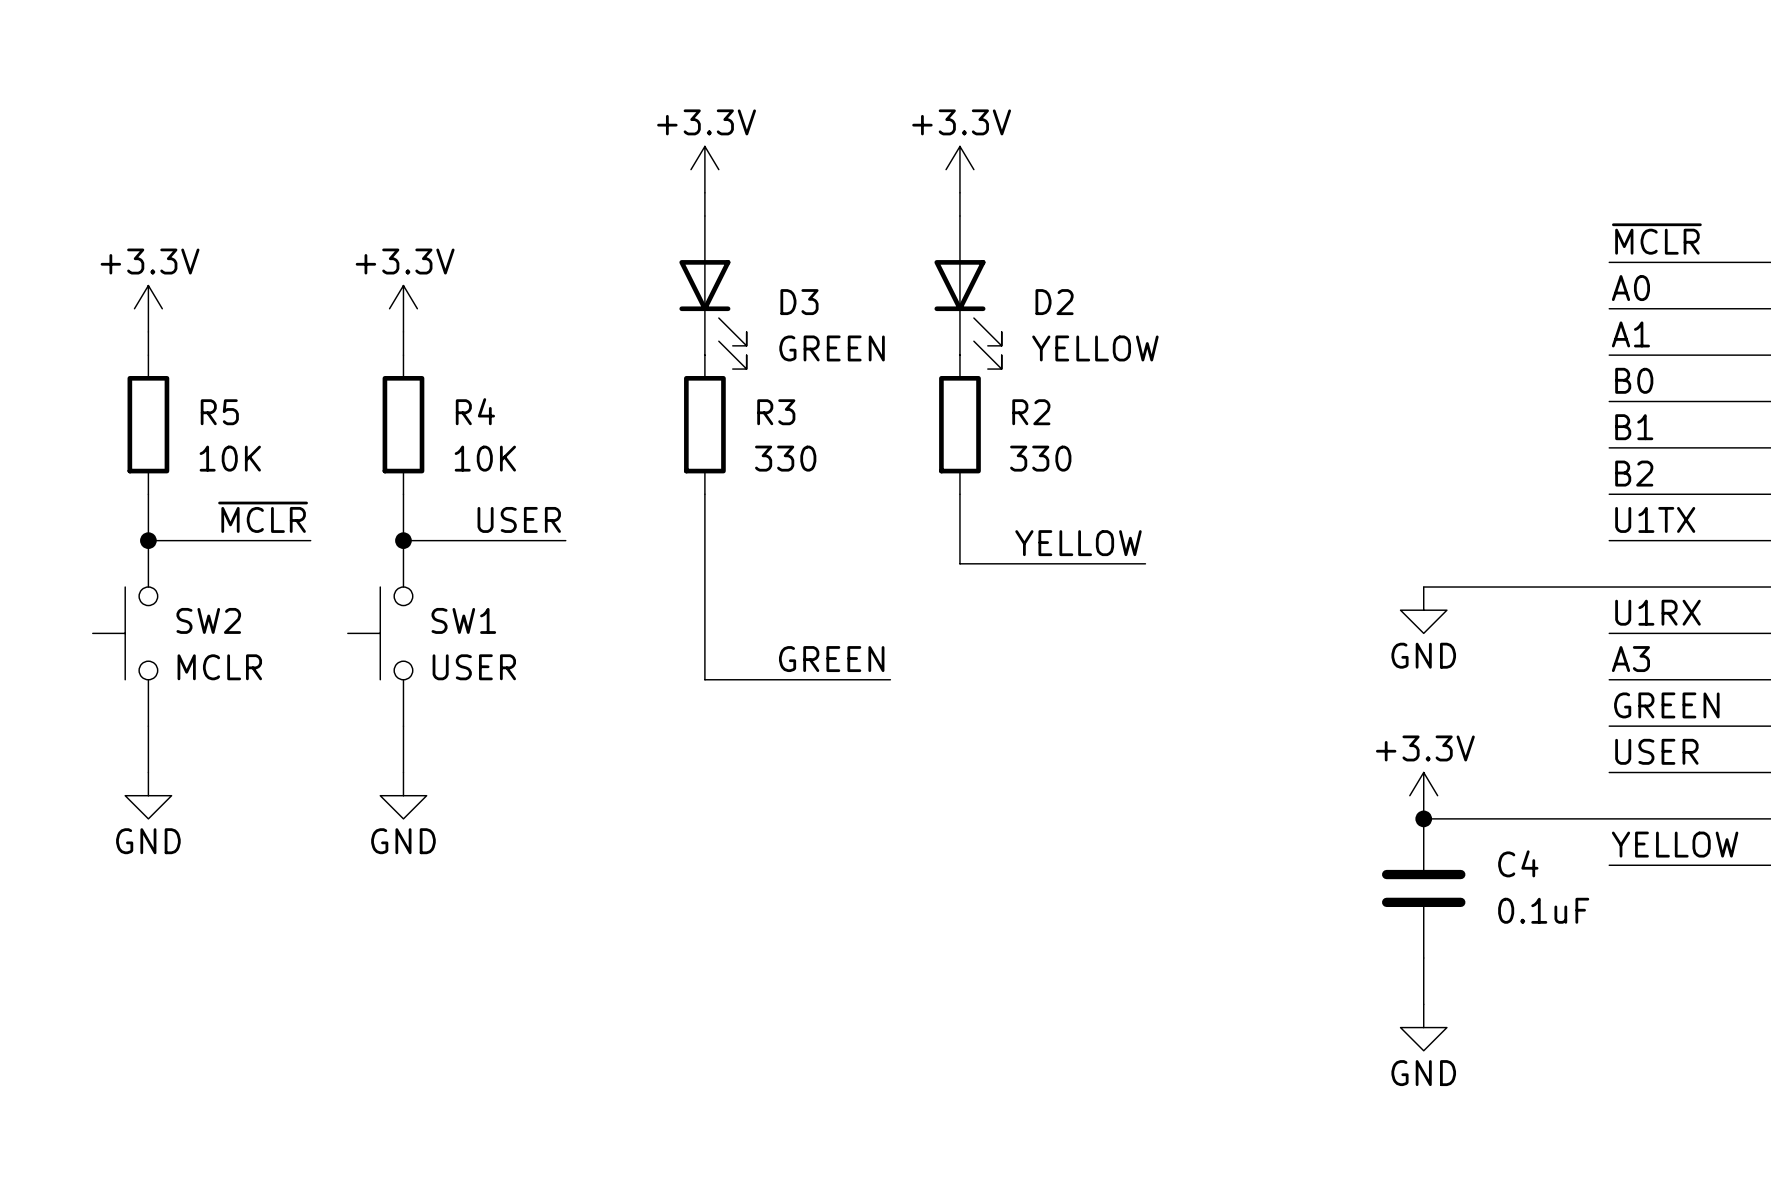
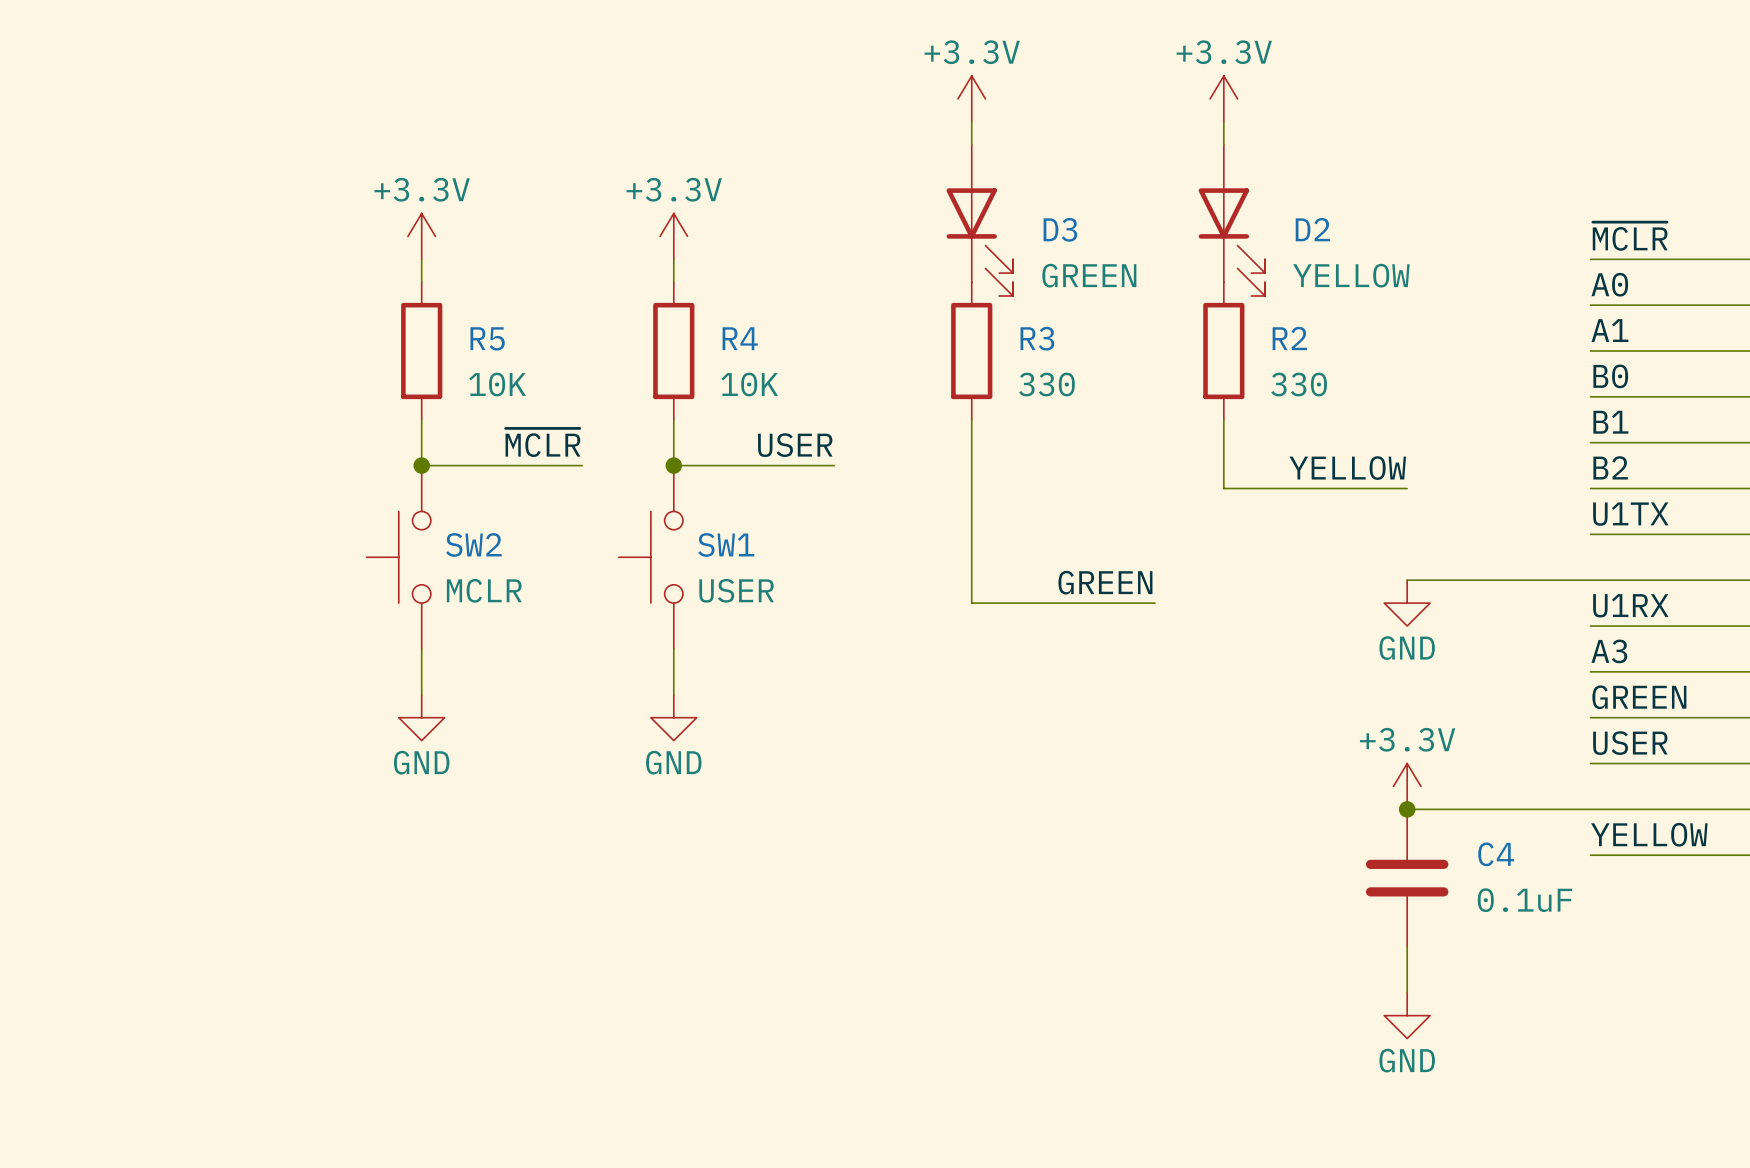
power symbol: none -> +3.3V (1223, 98)
power symbol position: +3.3V (704, 169) -> +3.3V (673, 236)
power symbol position: +3.3V (959, 169) -> +3.3V (971, 98)
wire: (704, 192) (704, 216) -> (971, 121) (971, 144)
wire: (959, 192) (959, 216) -> (1223, 121) (1223, 144)
D3 position: (713, 292) -> (979, 220)
D2 position: (968, 292) -> (1231, 220)
power symbol: +3.3V (148, 308) -> none
power symbol position: +3.3V (403, 308) -> +3.3V (421, 236)
wire: (148, 331) (148, 355) -> (421, 259) (421, 282)
wire: (403, 331) (403, 355) -> (673, 259) (673, 282)
R5 position: (148, 424) -> (421, 351)
R4 position: (403, 424) -> (673, 351)
R3 position: (704, 424) -> (971, 351)
R2 position: (959, 424) -> (1223, 351)
junction: none -> (673, 465)
wire: (148, 494) (148, 540) (310, 540) -> (421, 419) (421, 465) (582, 465)
wire: (403, 494) (403, 540) (565, 540) -> (673, 419) (673, 465) (834, 465)
wire: (704, 494) (704, 679) (890, 679) -> (971, 419) (971, 603) (1155, 603)
wire: (959, 494) (959, 563) (1145, 563) -> (1223, 419) (1223, 488) (1407, 488)
label position: ~{MCLR} (263, 517) -> ~{MCLR} (543, 442)
label position: USER (519, 519) -> USER (795, 445)
junction: (148, 540) -> none
junction position: (403, 540) -> (421, 465)
label position: YELLOW (1078, 543) -> YELLOW (1347, 468)
SW2 position: (125, 633) -> (398, 557)
SW1 position: (380, 633) -> (650, 557)
label position: GREEN (831, 659) -> GREEN (1105, 582)
wire: (148, 726) (148, 772) -> (421, 648) (421, 694)
wire: (403, 726) (403, 772) -> (673, 648) (673, 694)
power symbol: none -> GND (673, 717)
power symbol: GND (148, 795) -> none
power symbol position: GND (403, 795) -> GND (421, 717)

